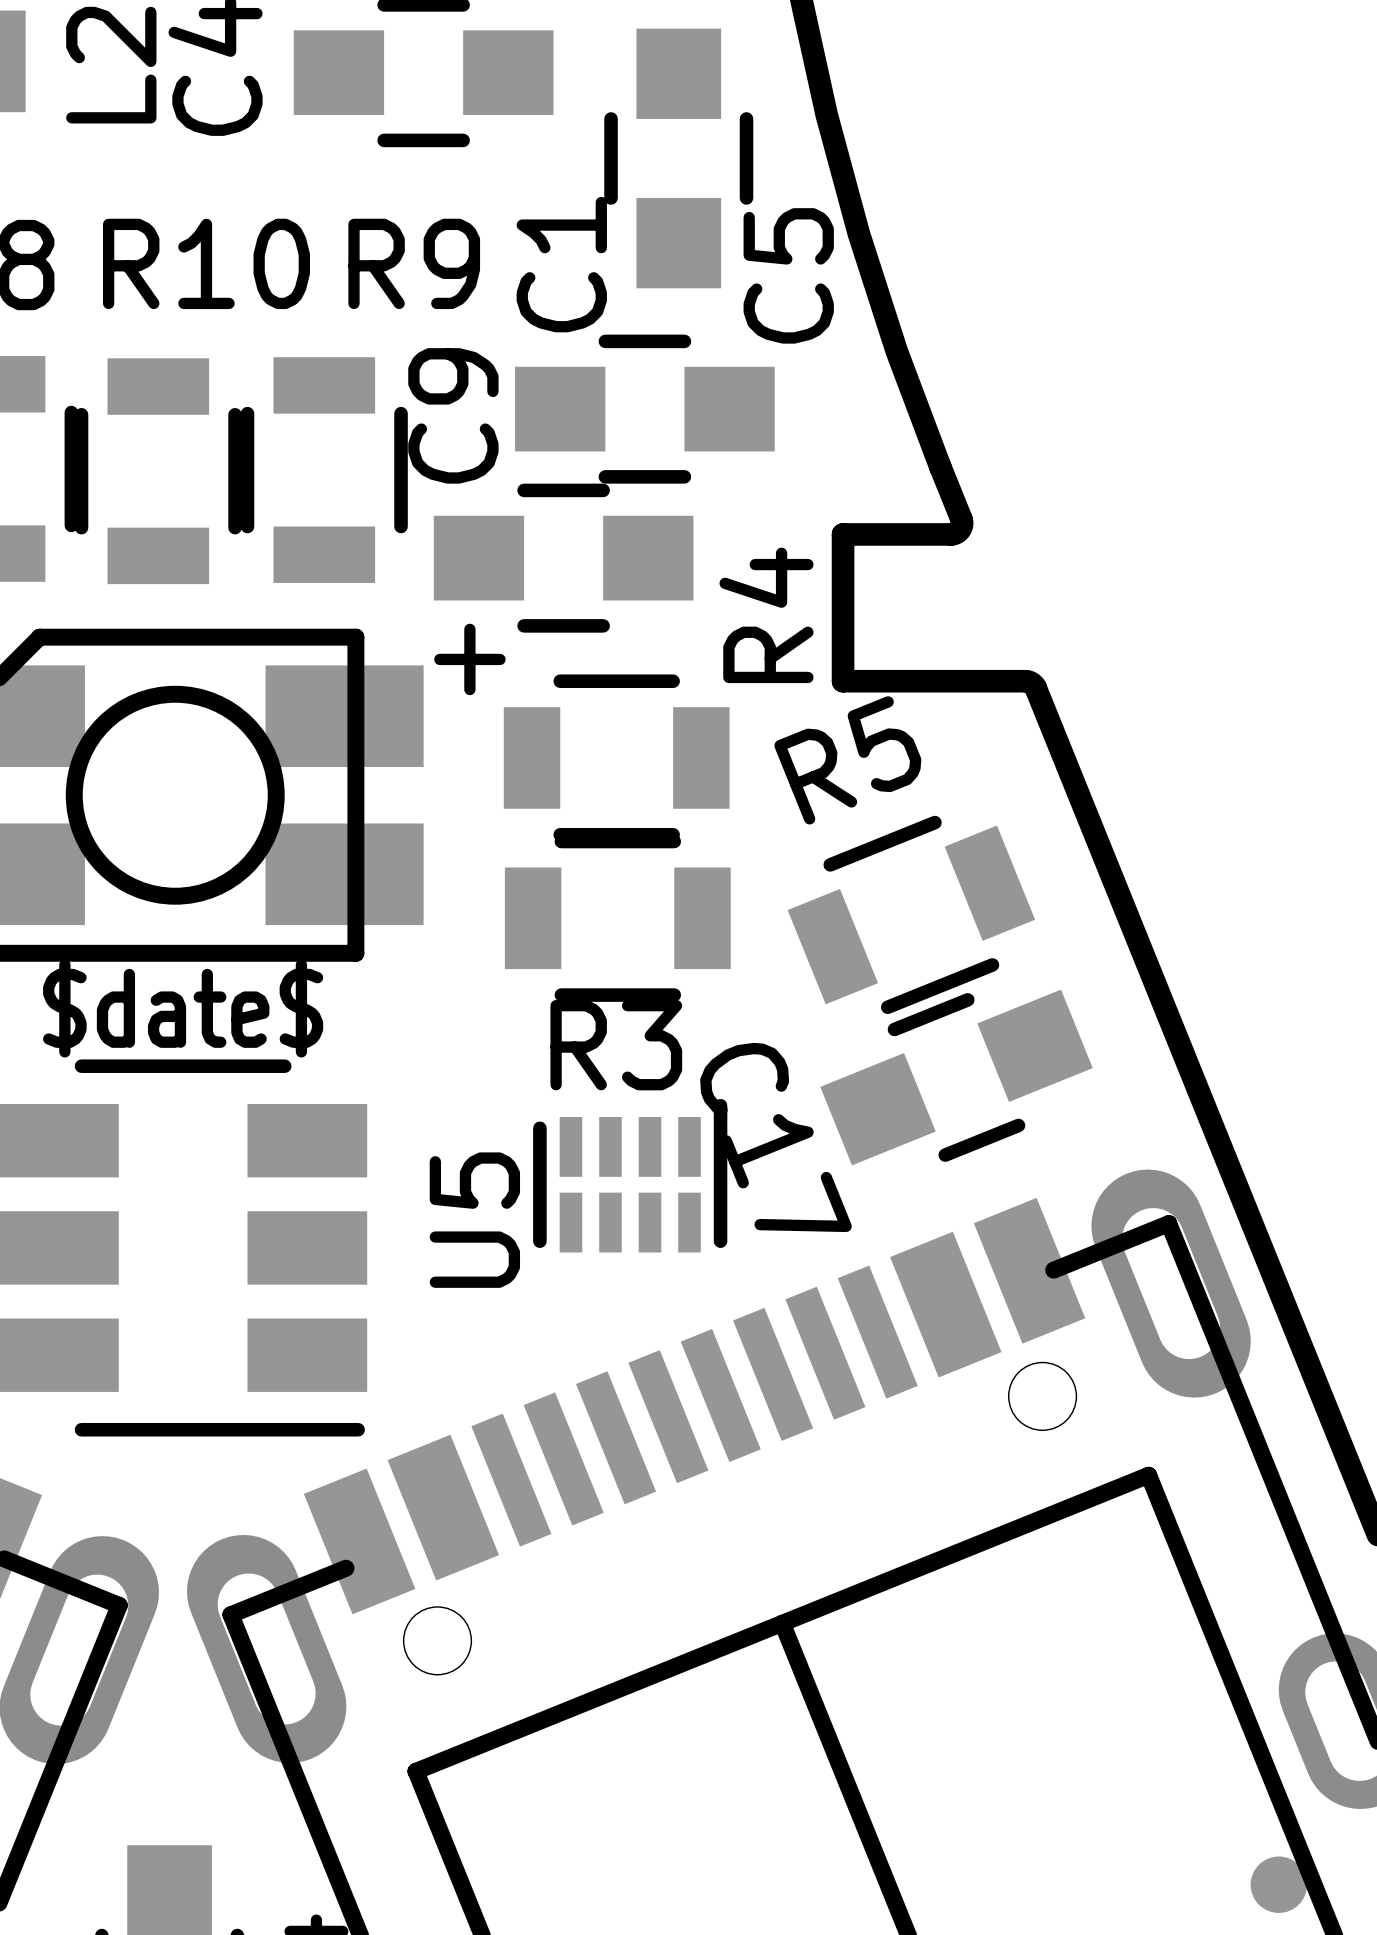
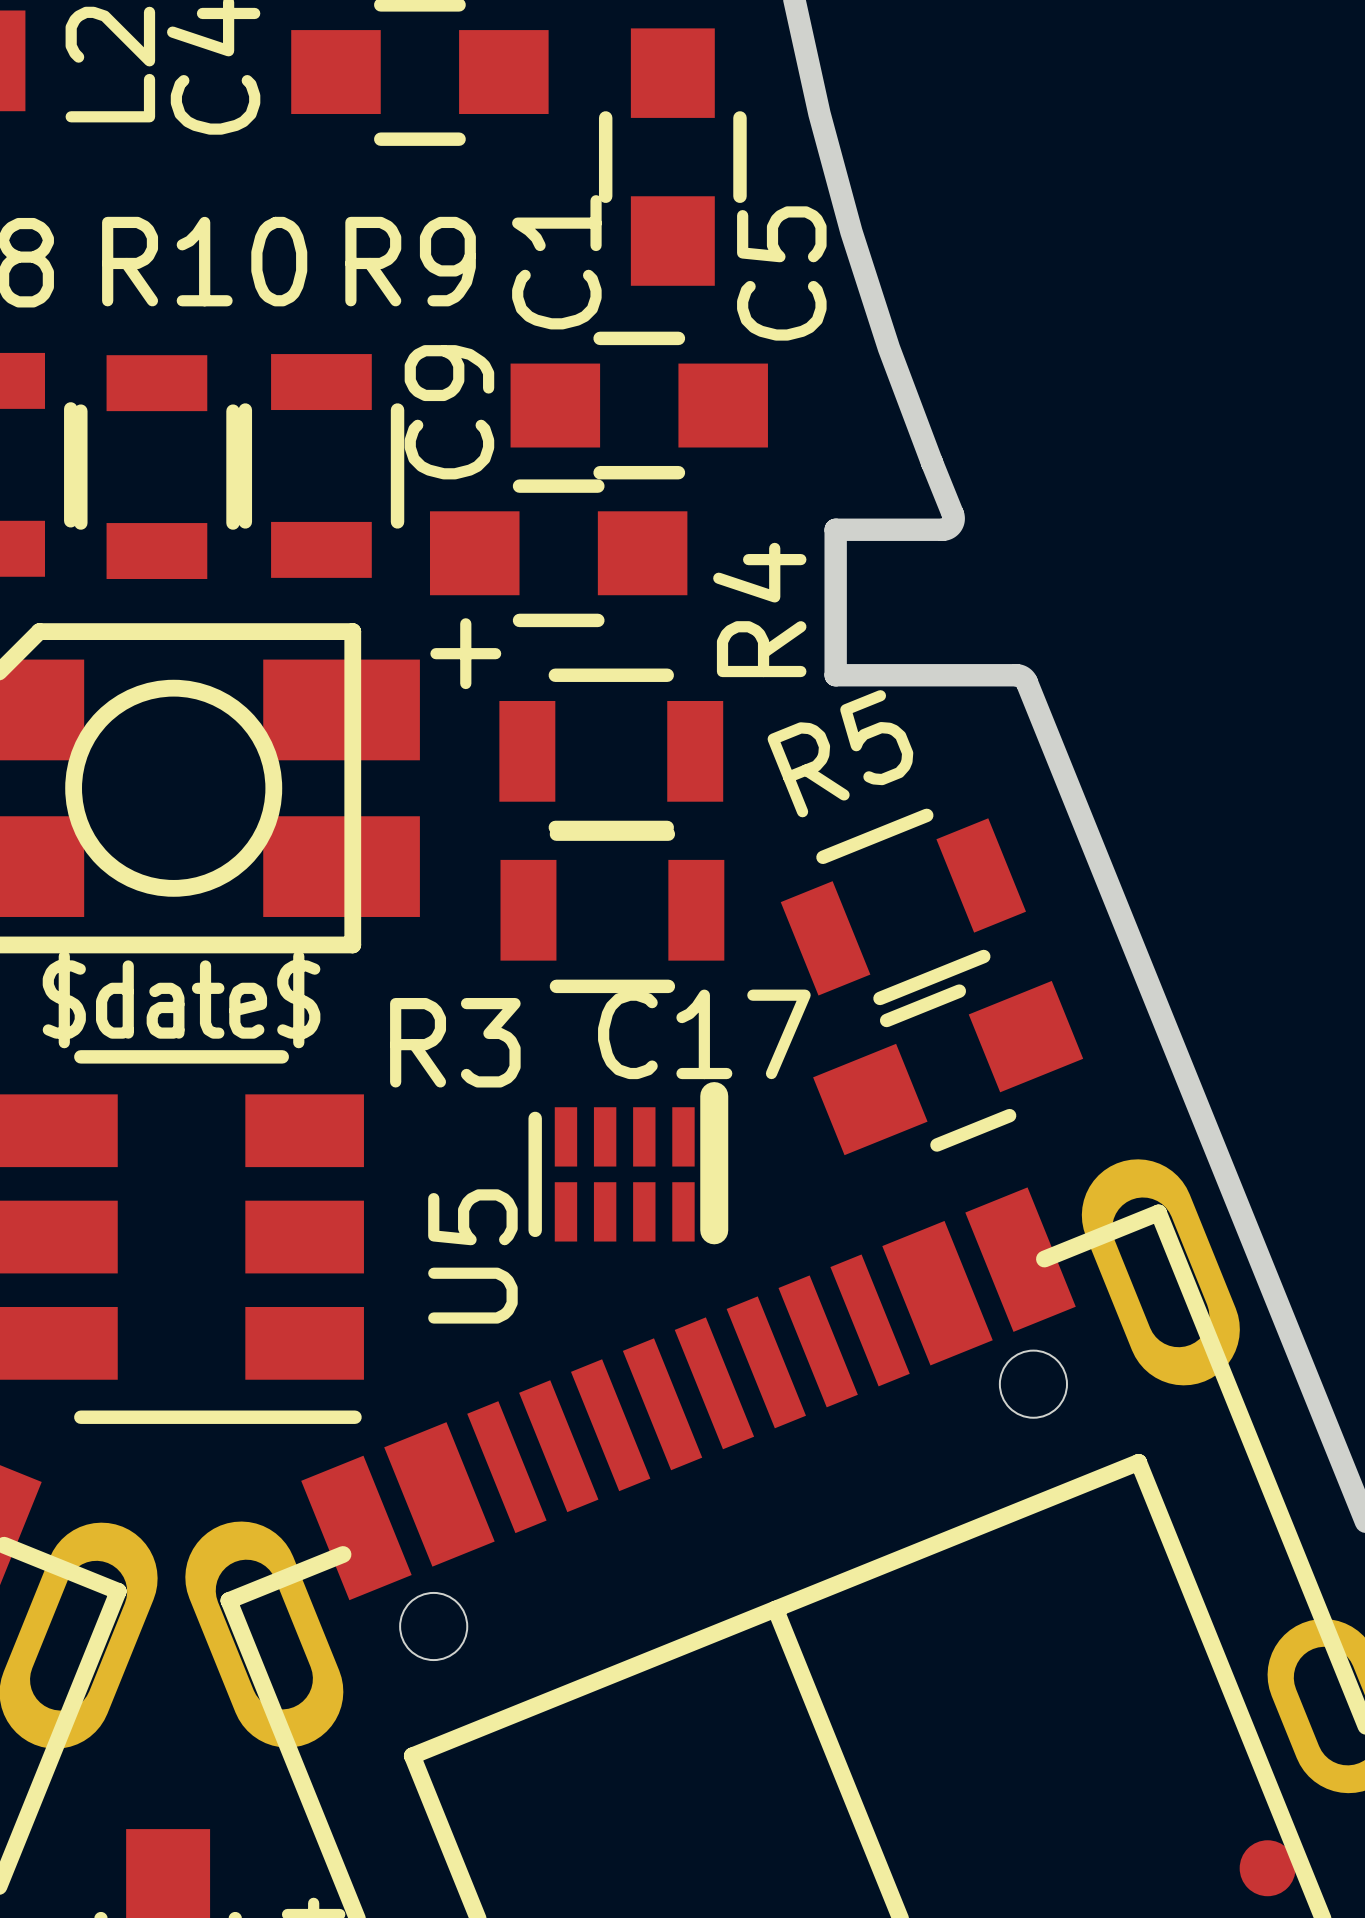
R3 name position: R3 (616, 1045) -> R3 (455, 1042)
U5 footprint: [533, 1098, 728, 1253] -> [528, 1082, 729, 1245]
C17 name rotation: 0° (775, 1137) -> 68° counterclockwise (704, 1034)
U5 name position: U5 (474, 1220) -> U5 (472, 1256)

